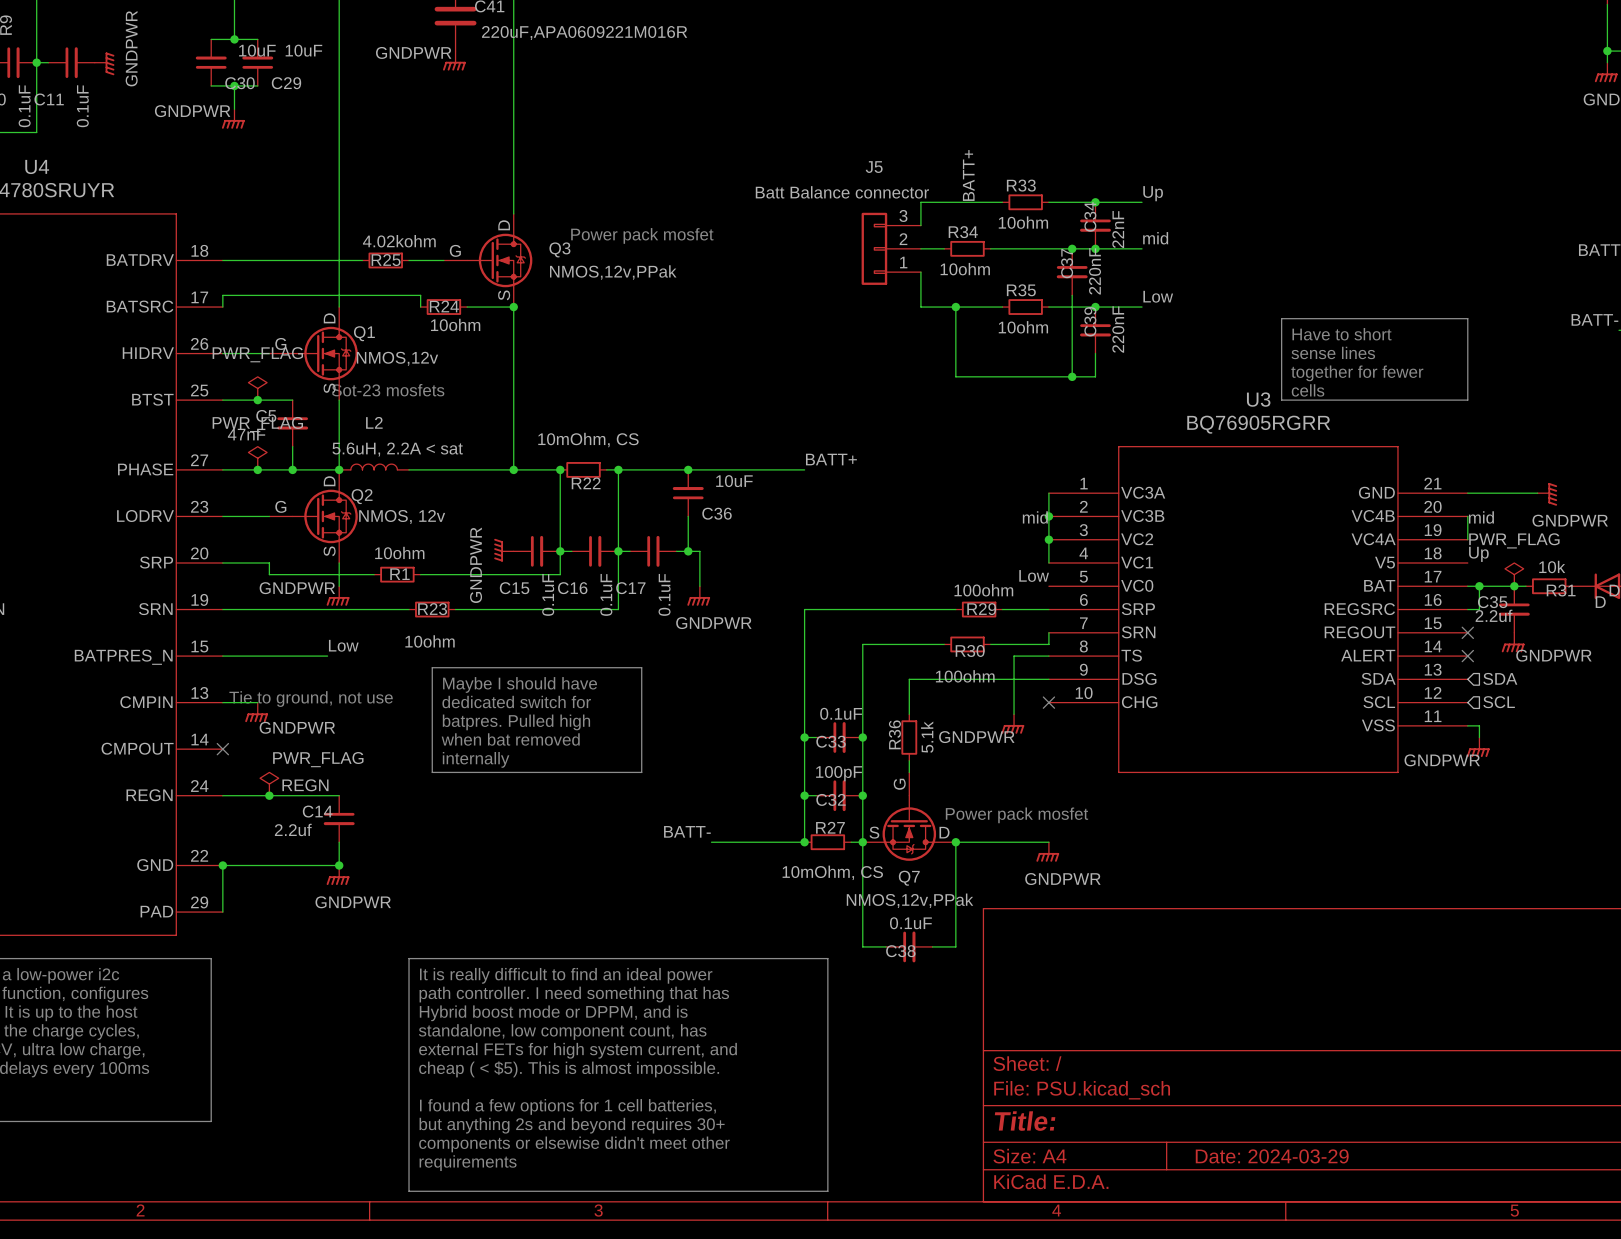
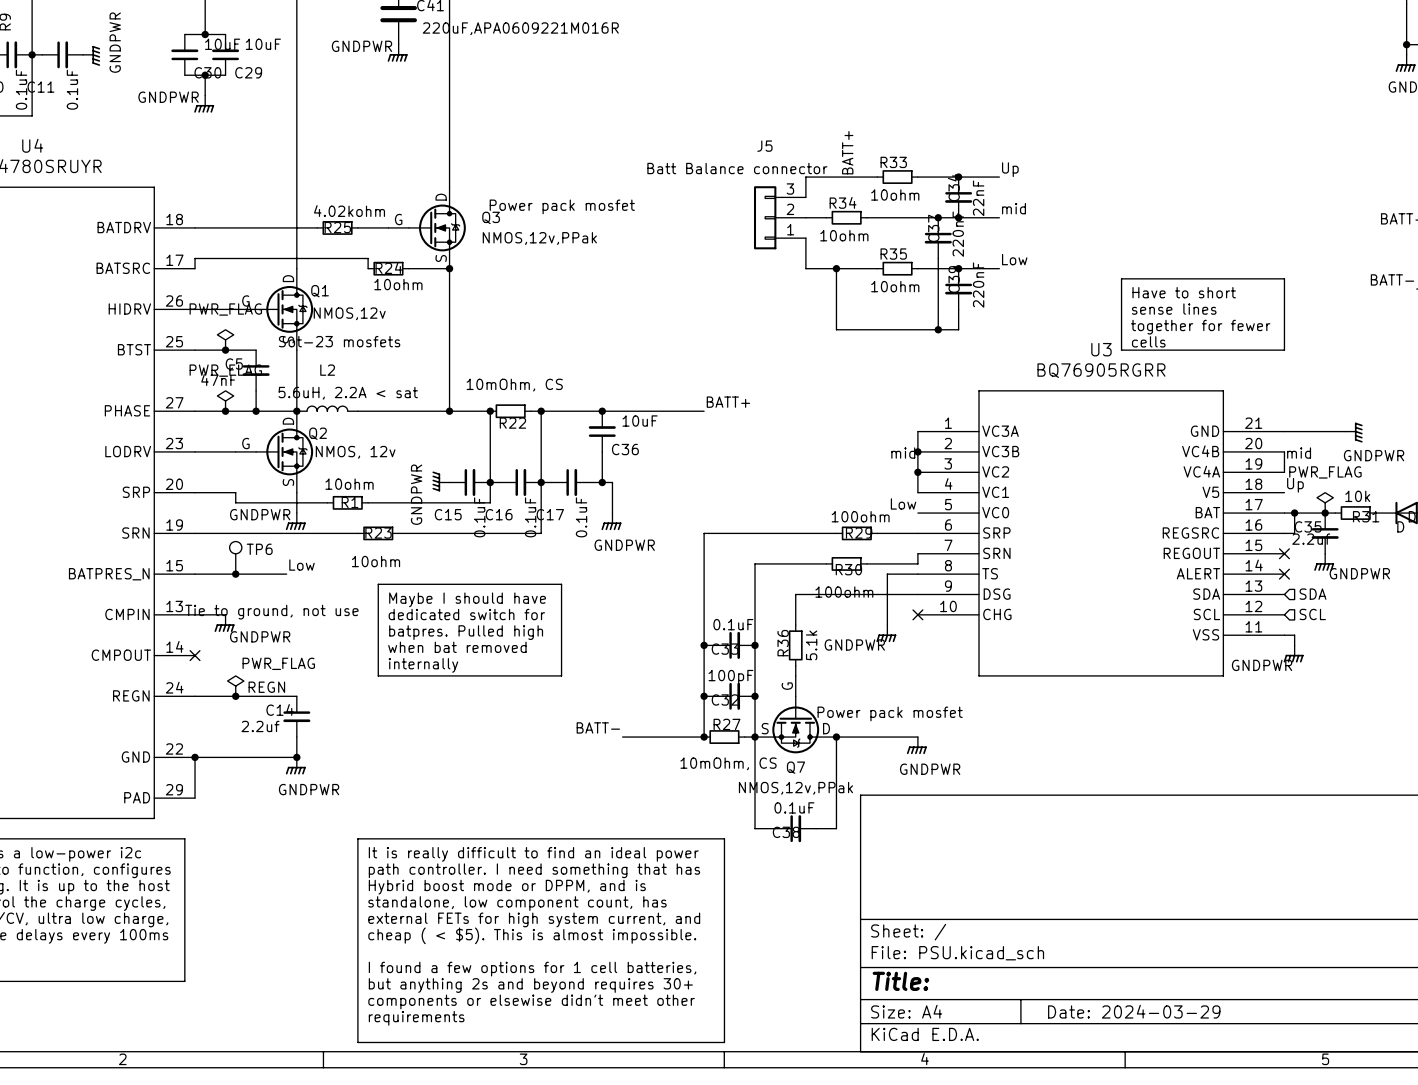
TP6: none -> (235, 557)
junction: none -> (235, 574)

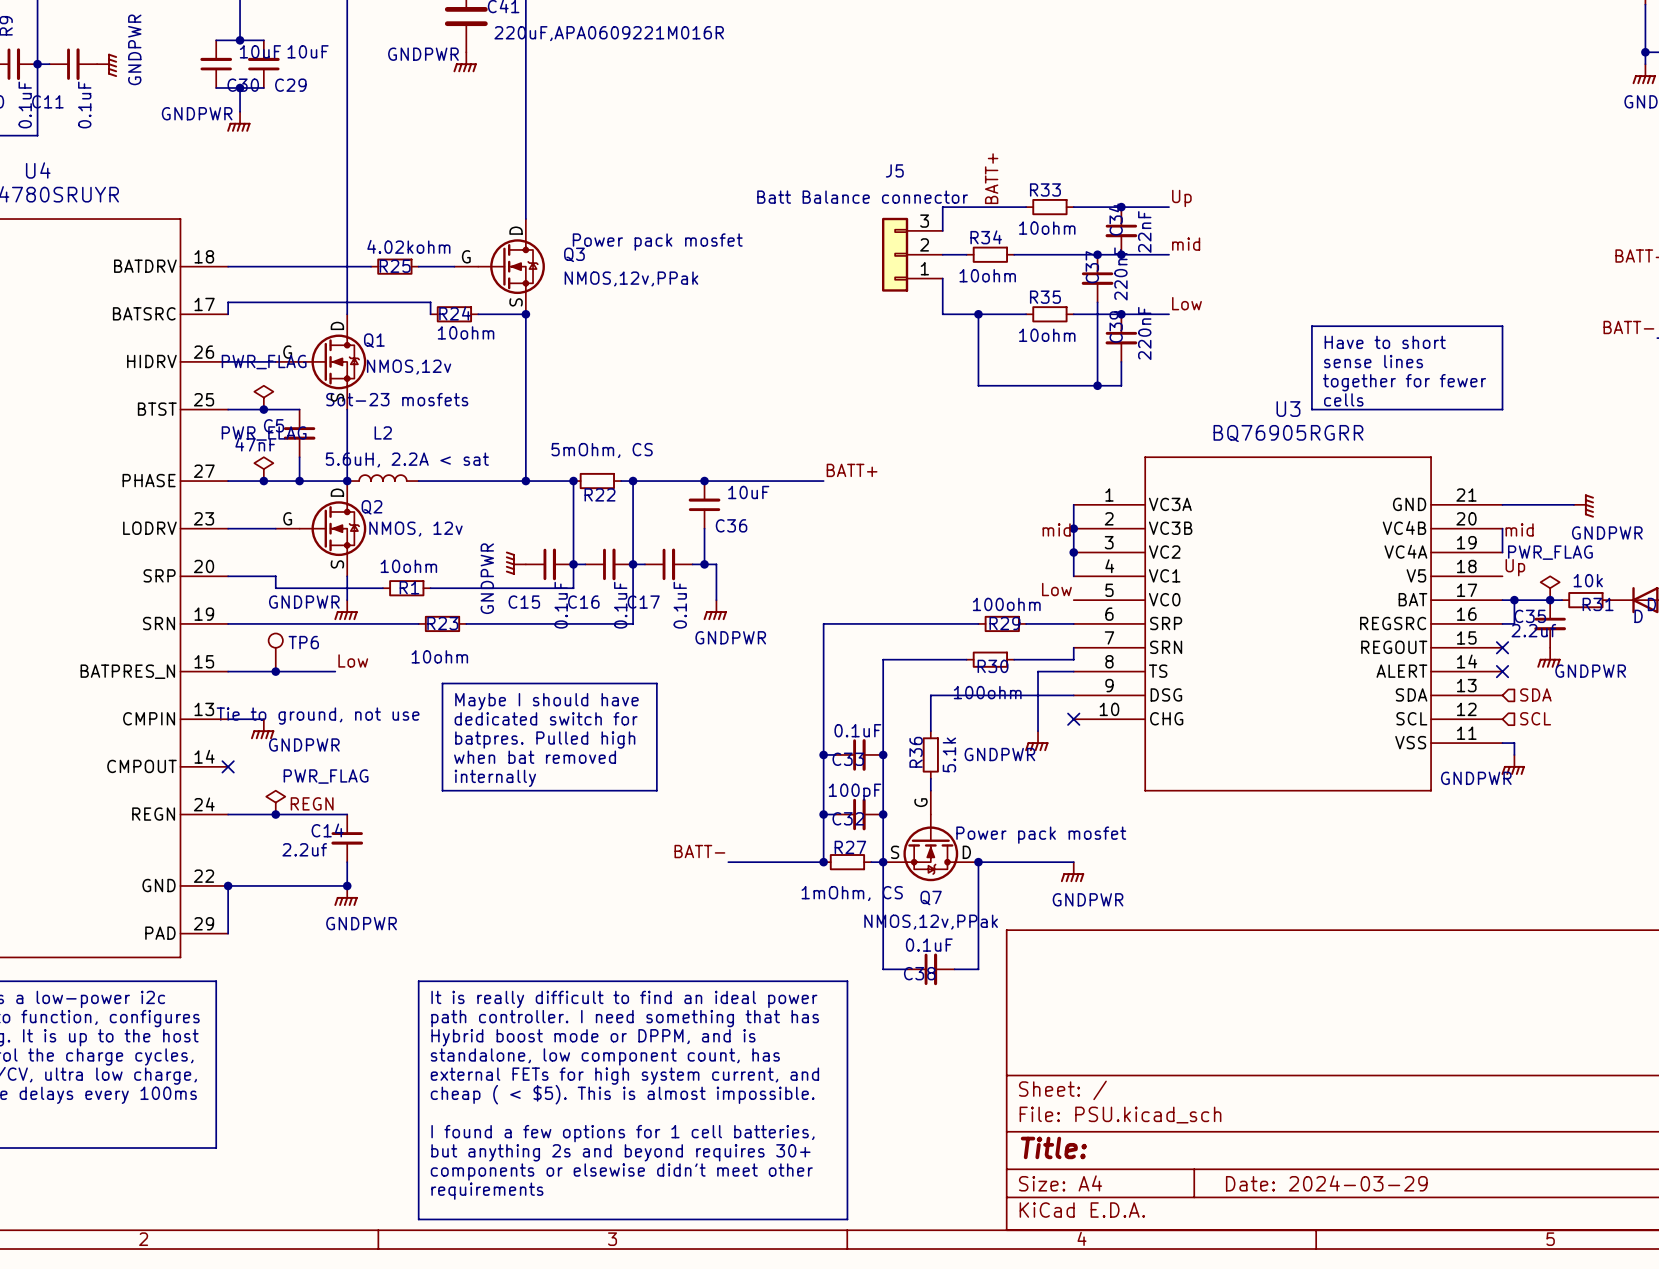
R22 value: 10mOhm, CS (514, 385) -> 5mOhm, CS (602, 450)
R27 value: 10mOhm, CS (728, 763) -> 1mOhm, CS (852, 893)

